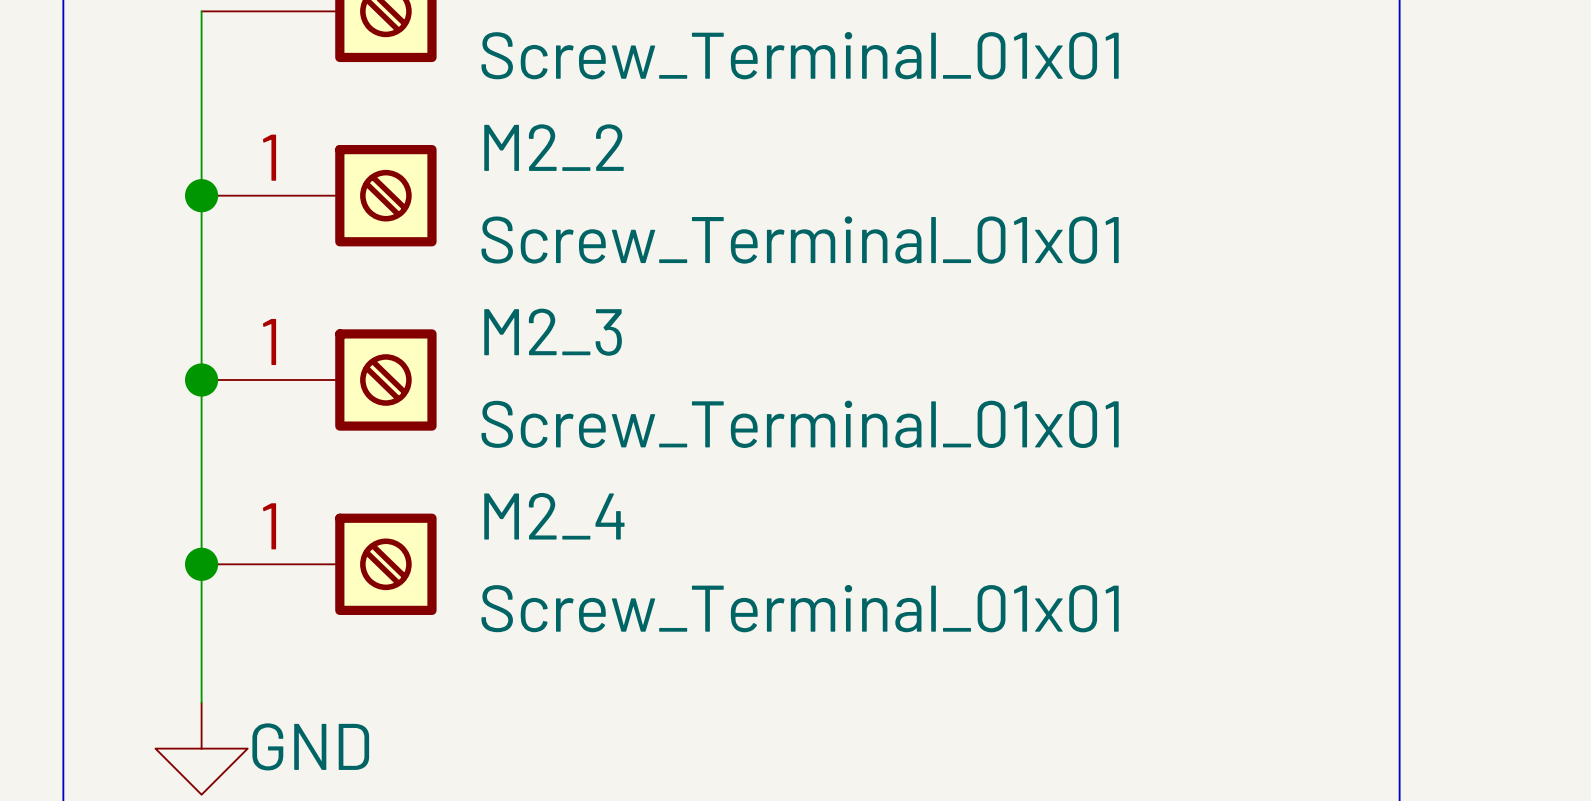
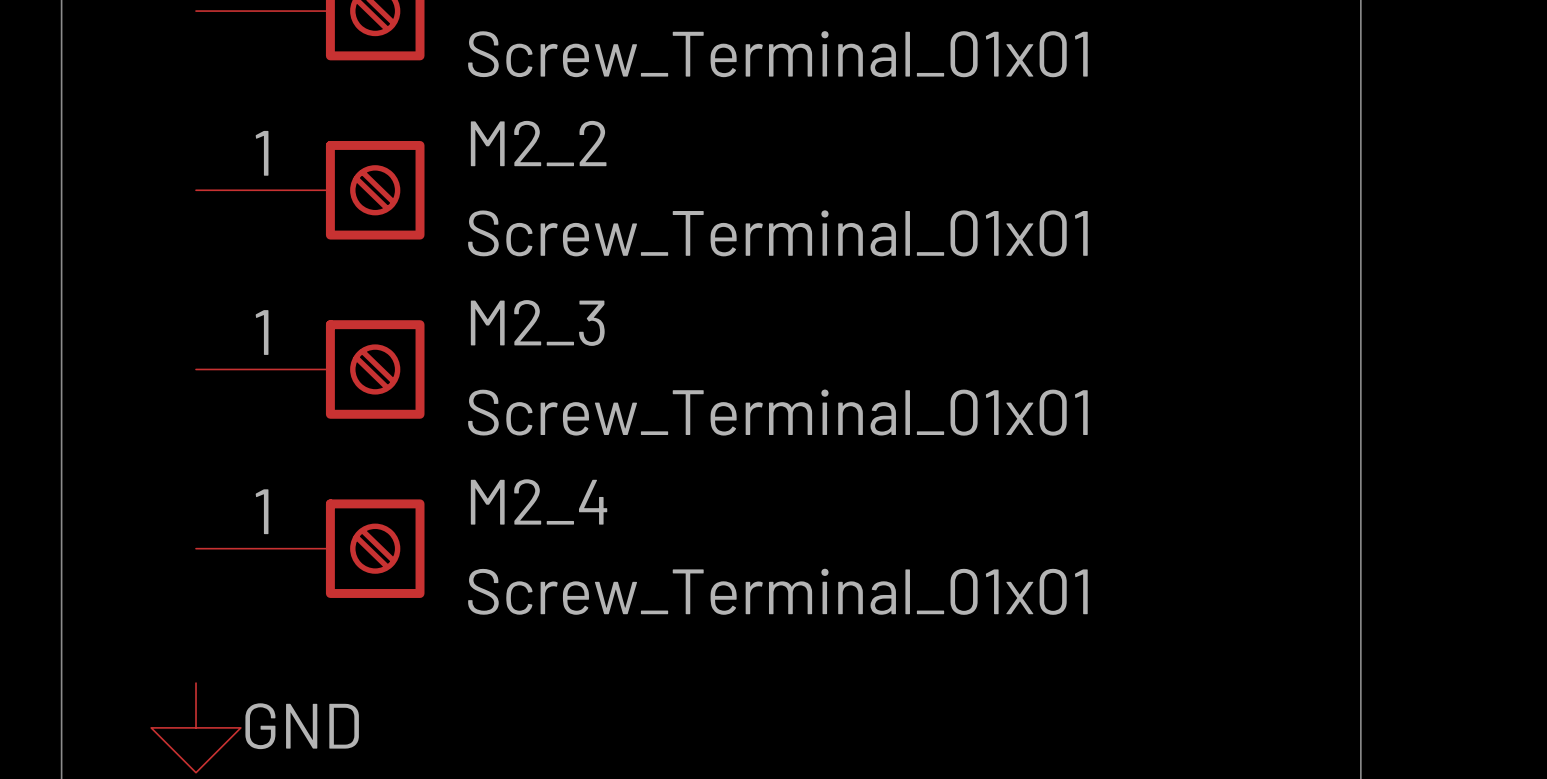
wire: (201, 11) (201, 702) -> none
junction: (201, 195) -> none
junction: (201, 380) -> none
junction: (201, 564) -> none

